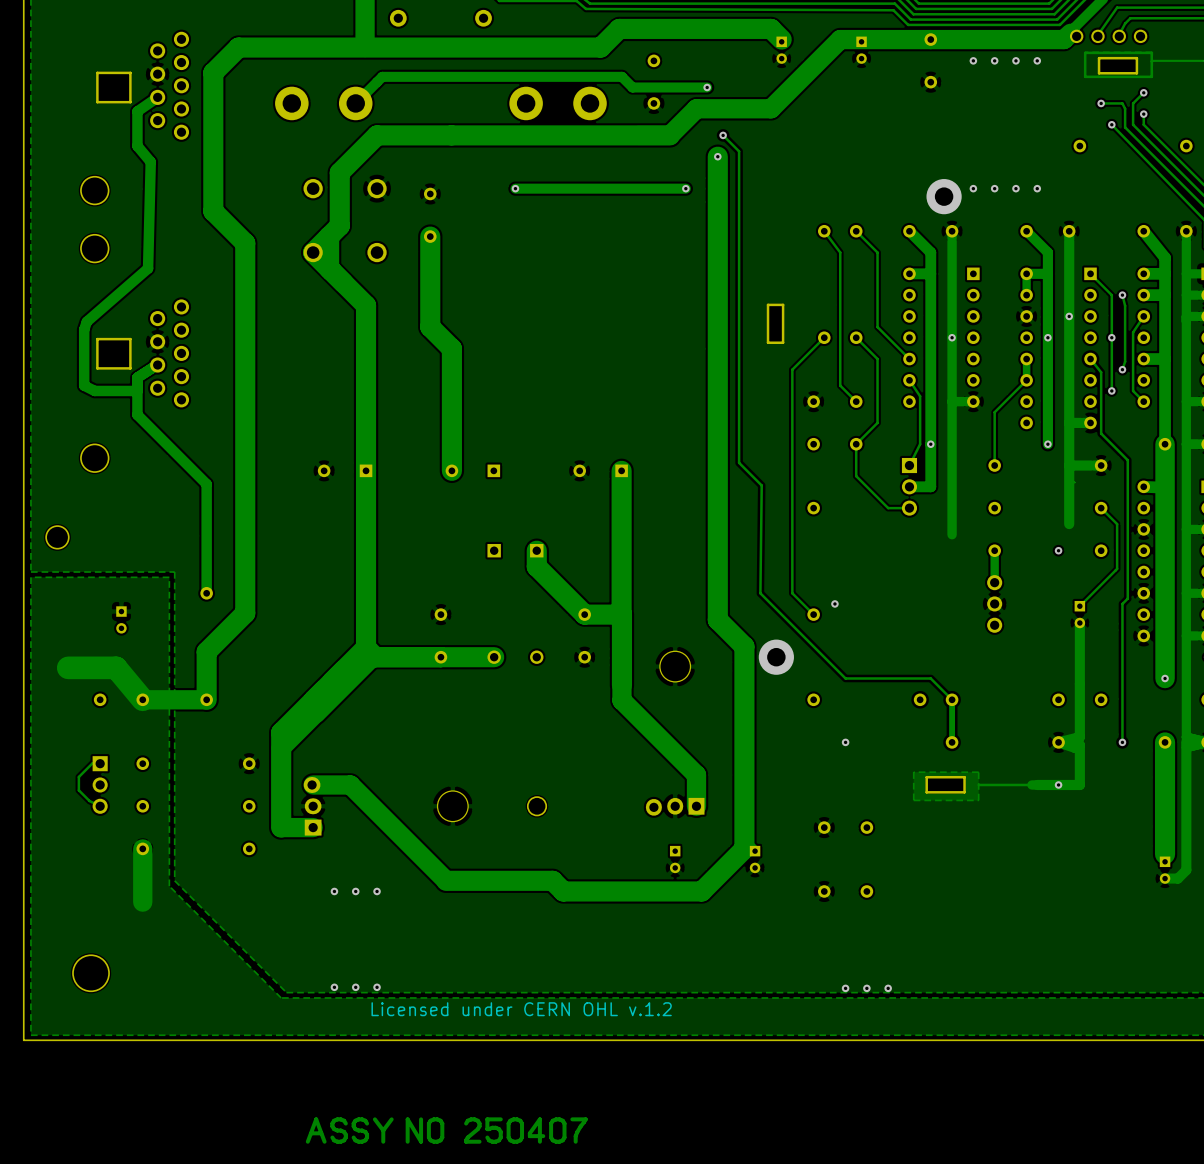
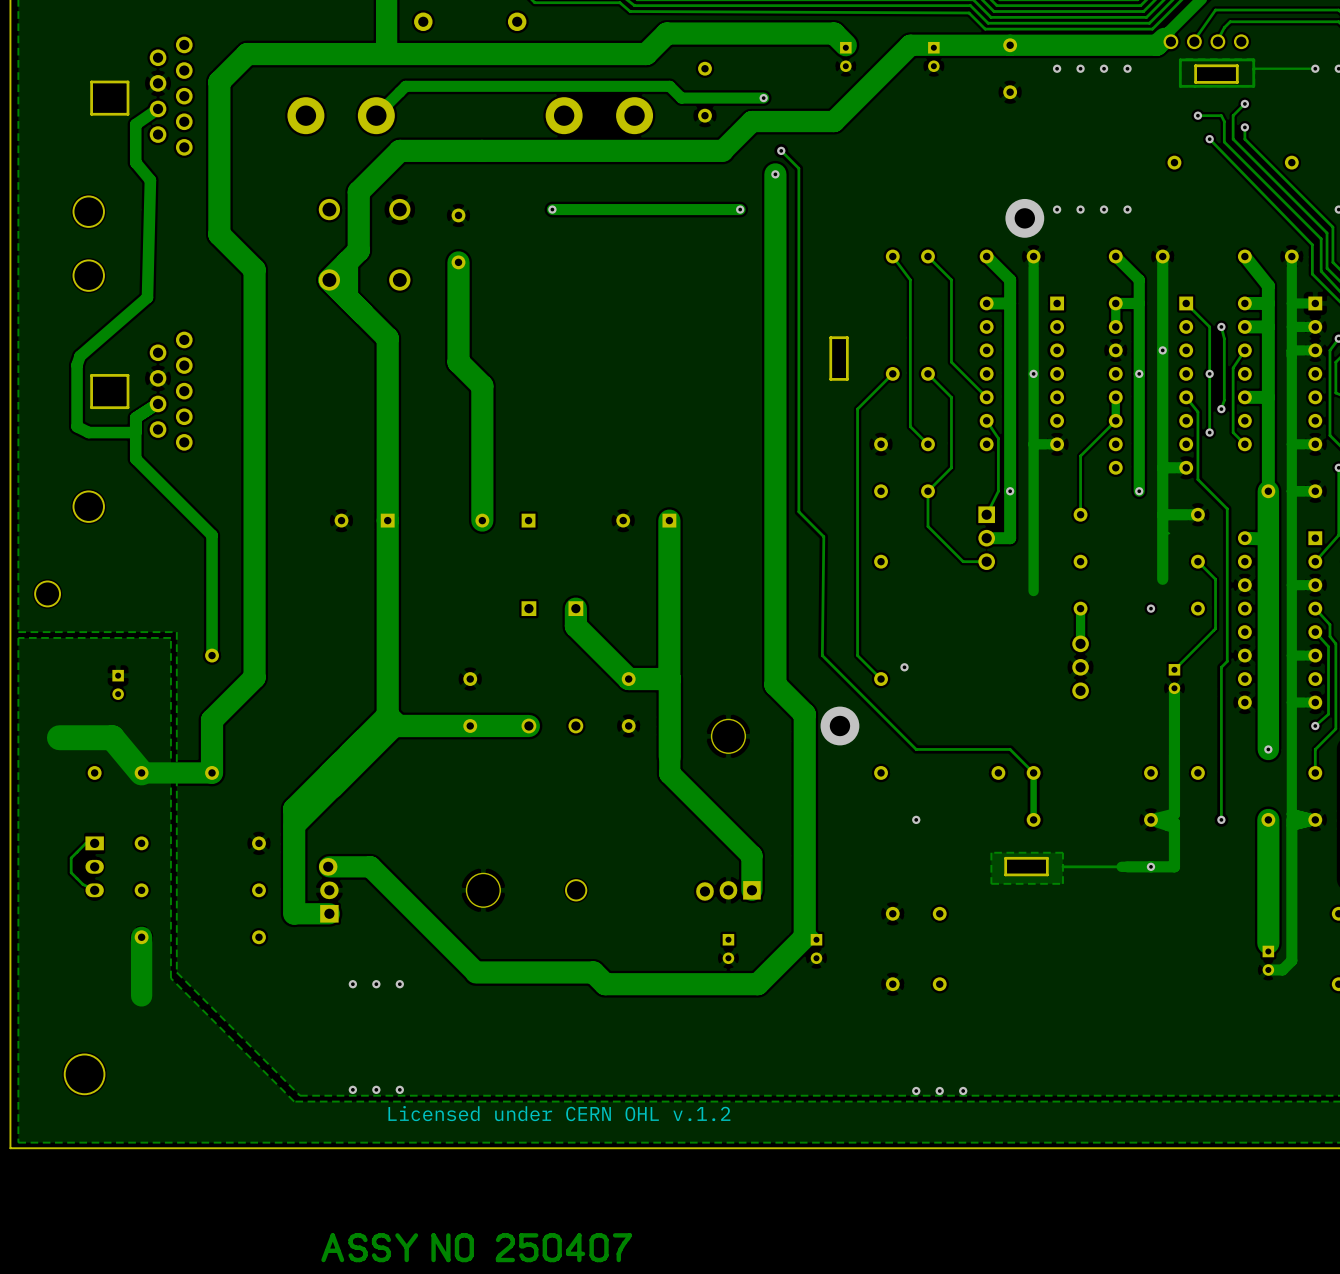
part footprint: [92, 756, 108, 814] -> [85, 836, 104, 898]

